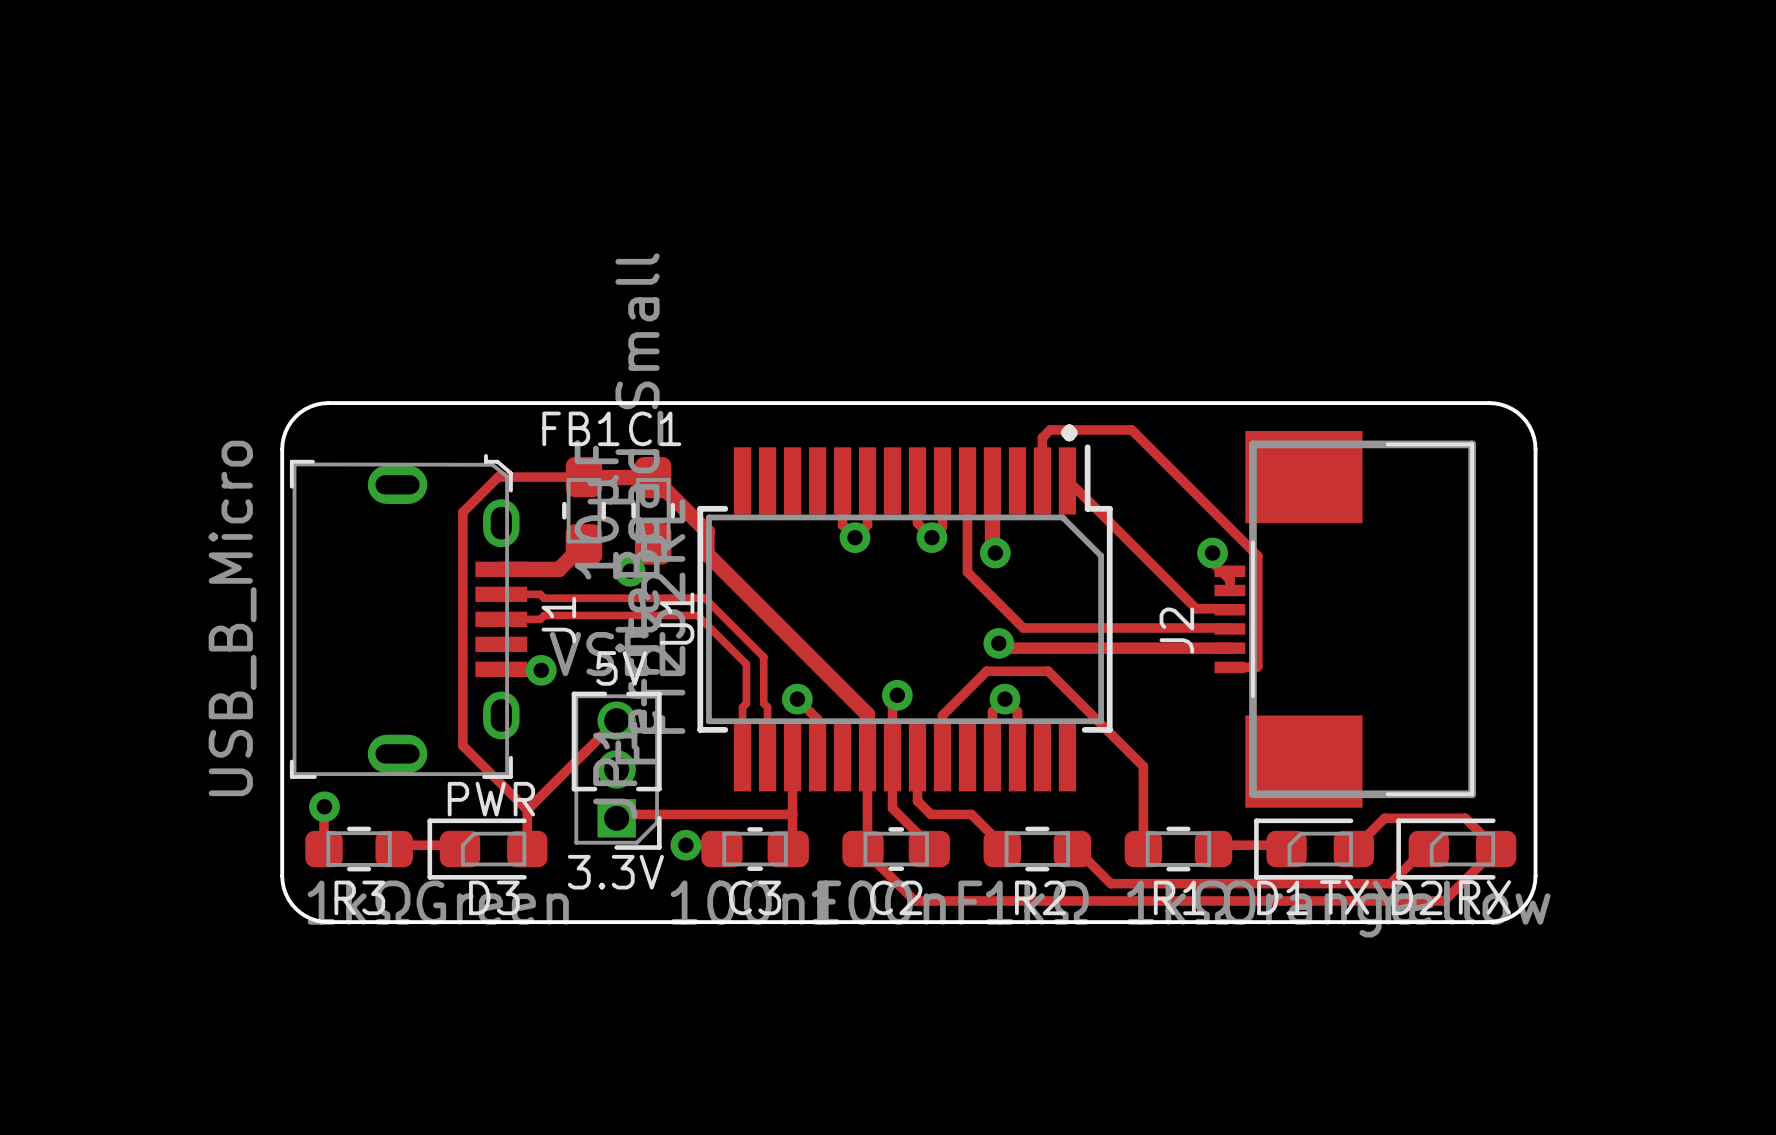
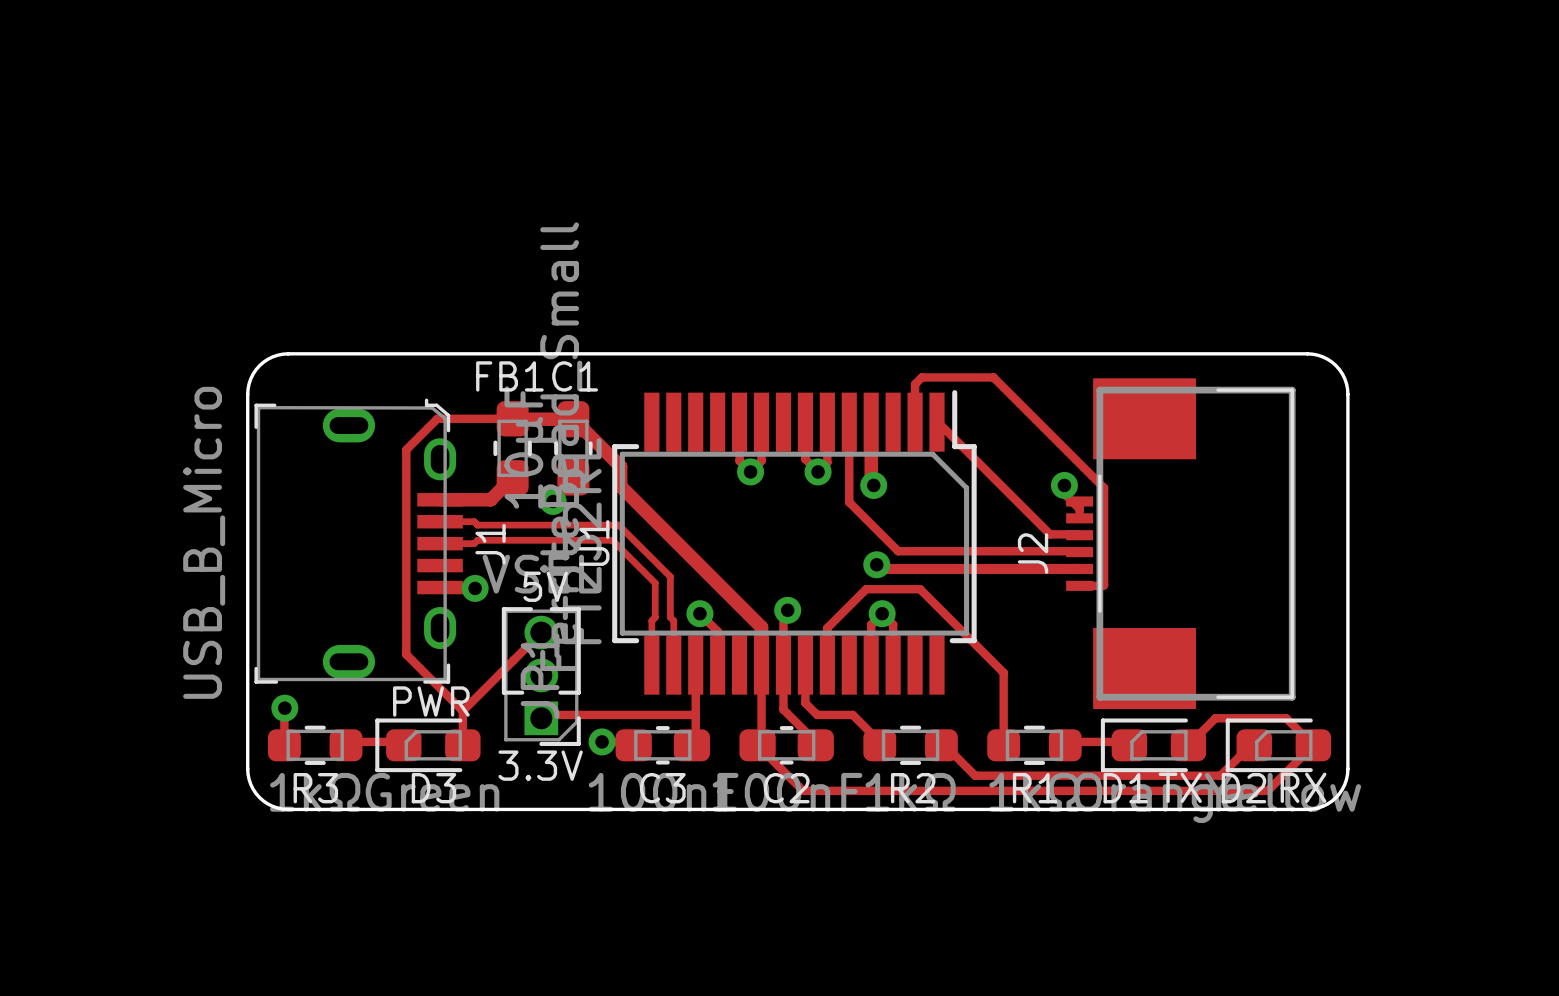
text: . (1069, 432) -> none

